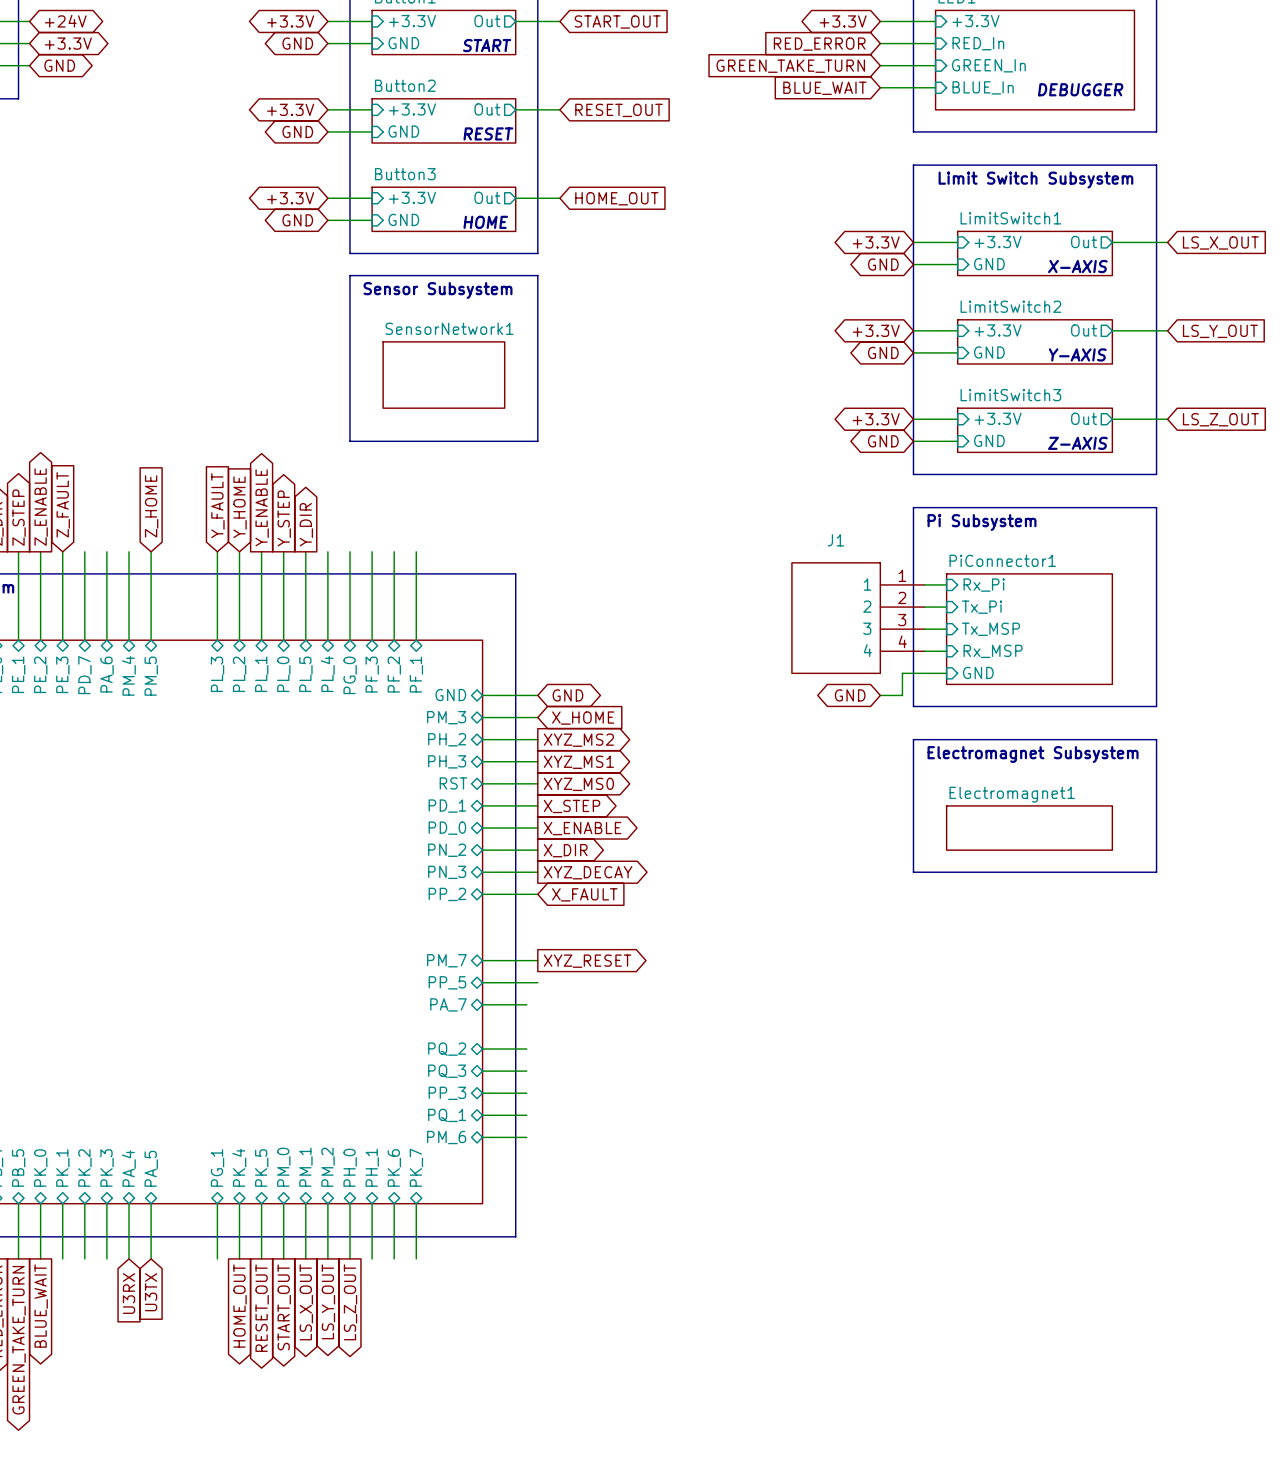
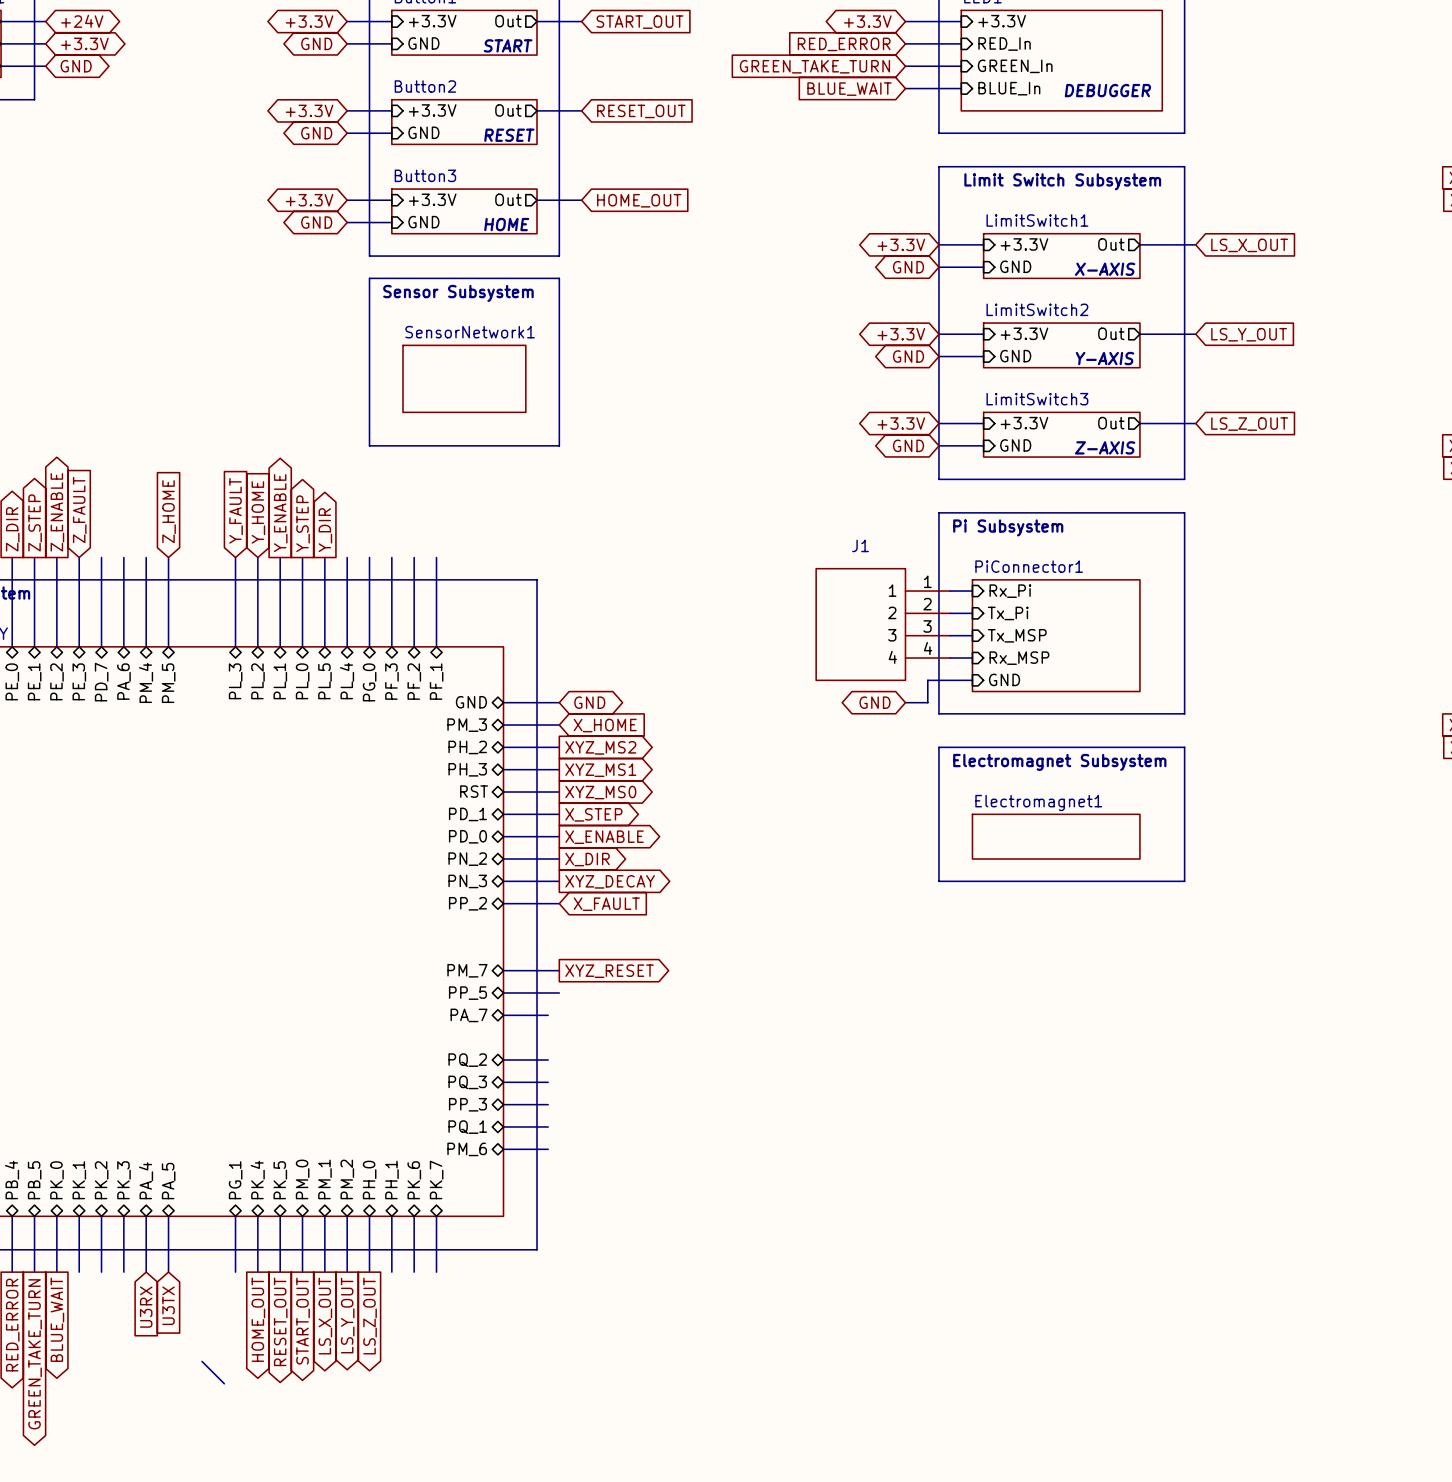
wire: none -> (202, 1361) (224, 1383)

